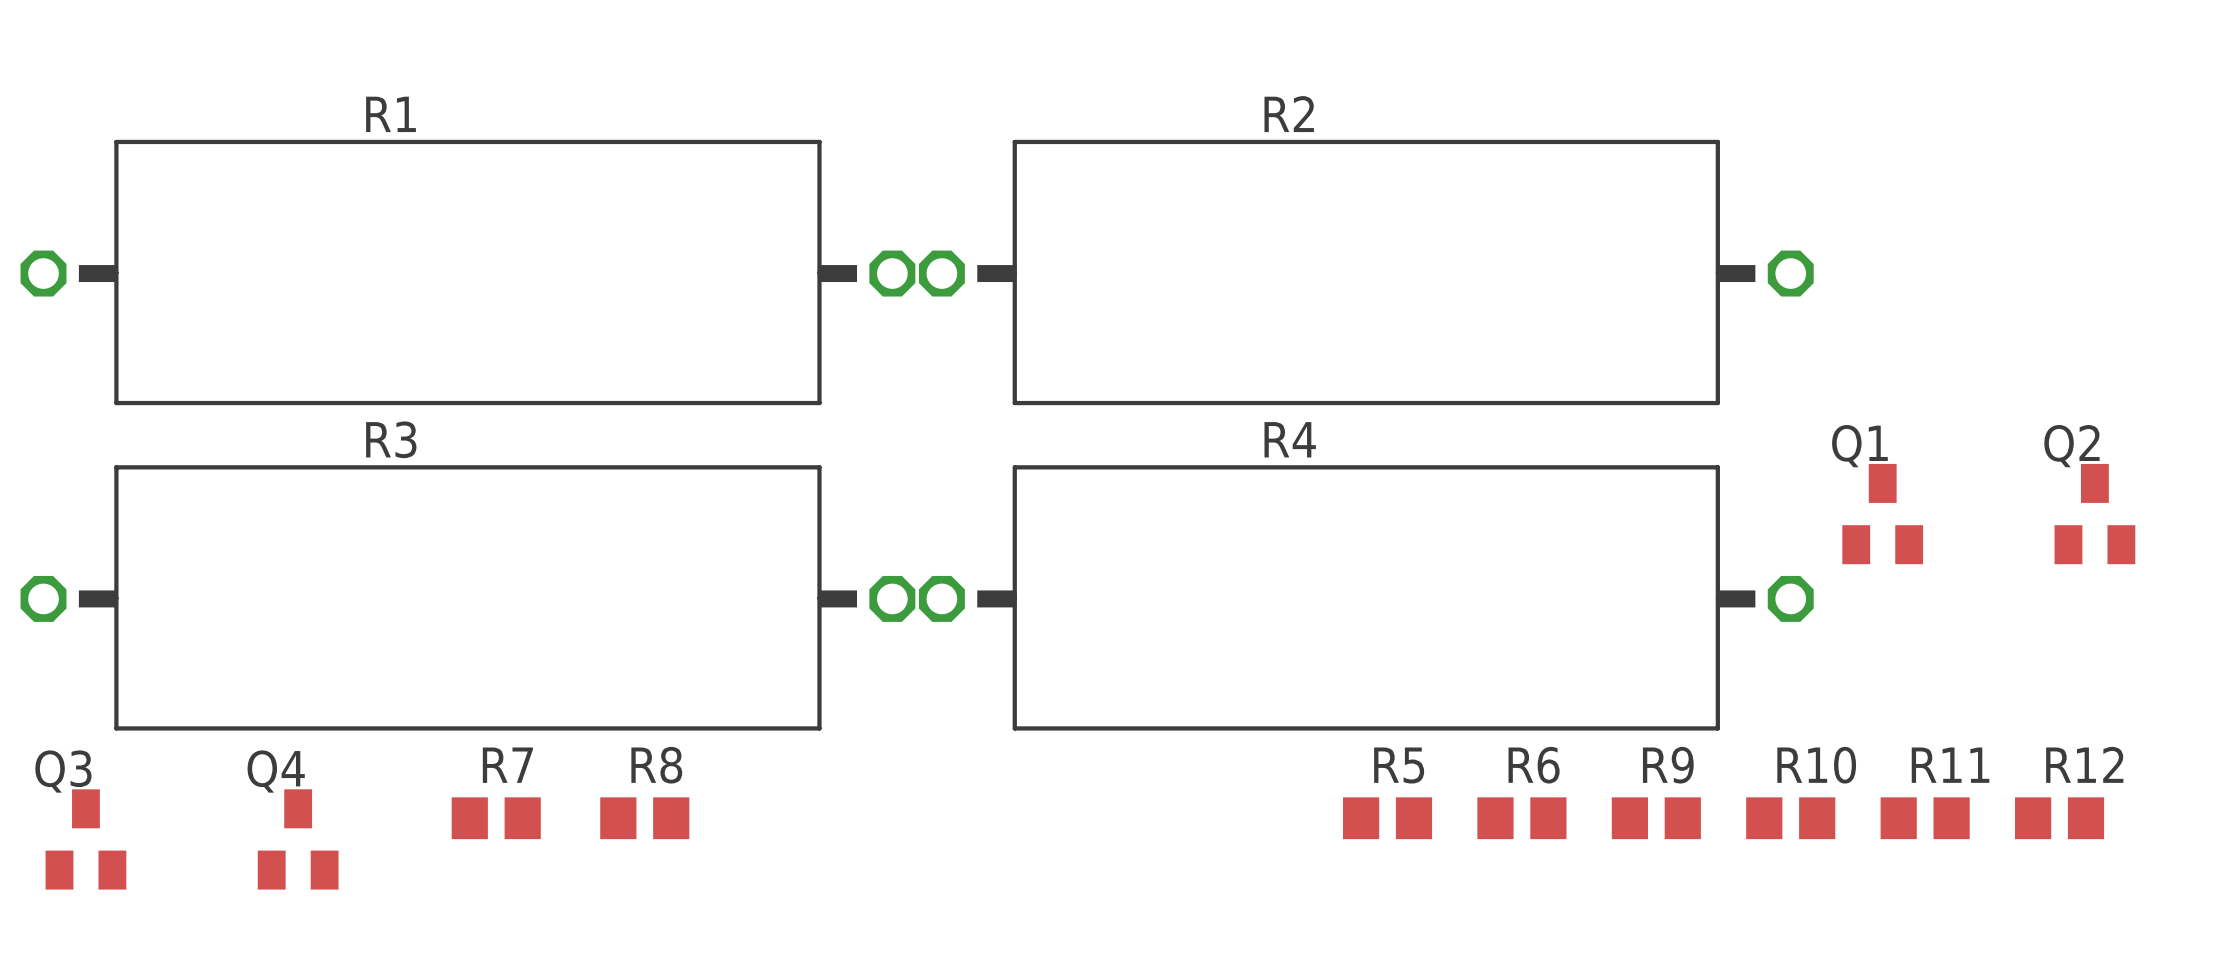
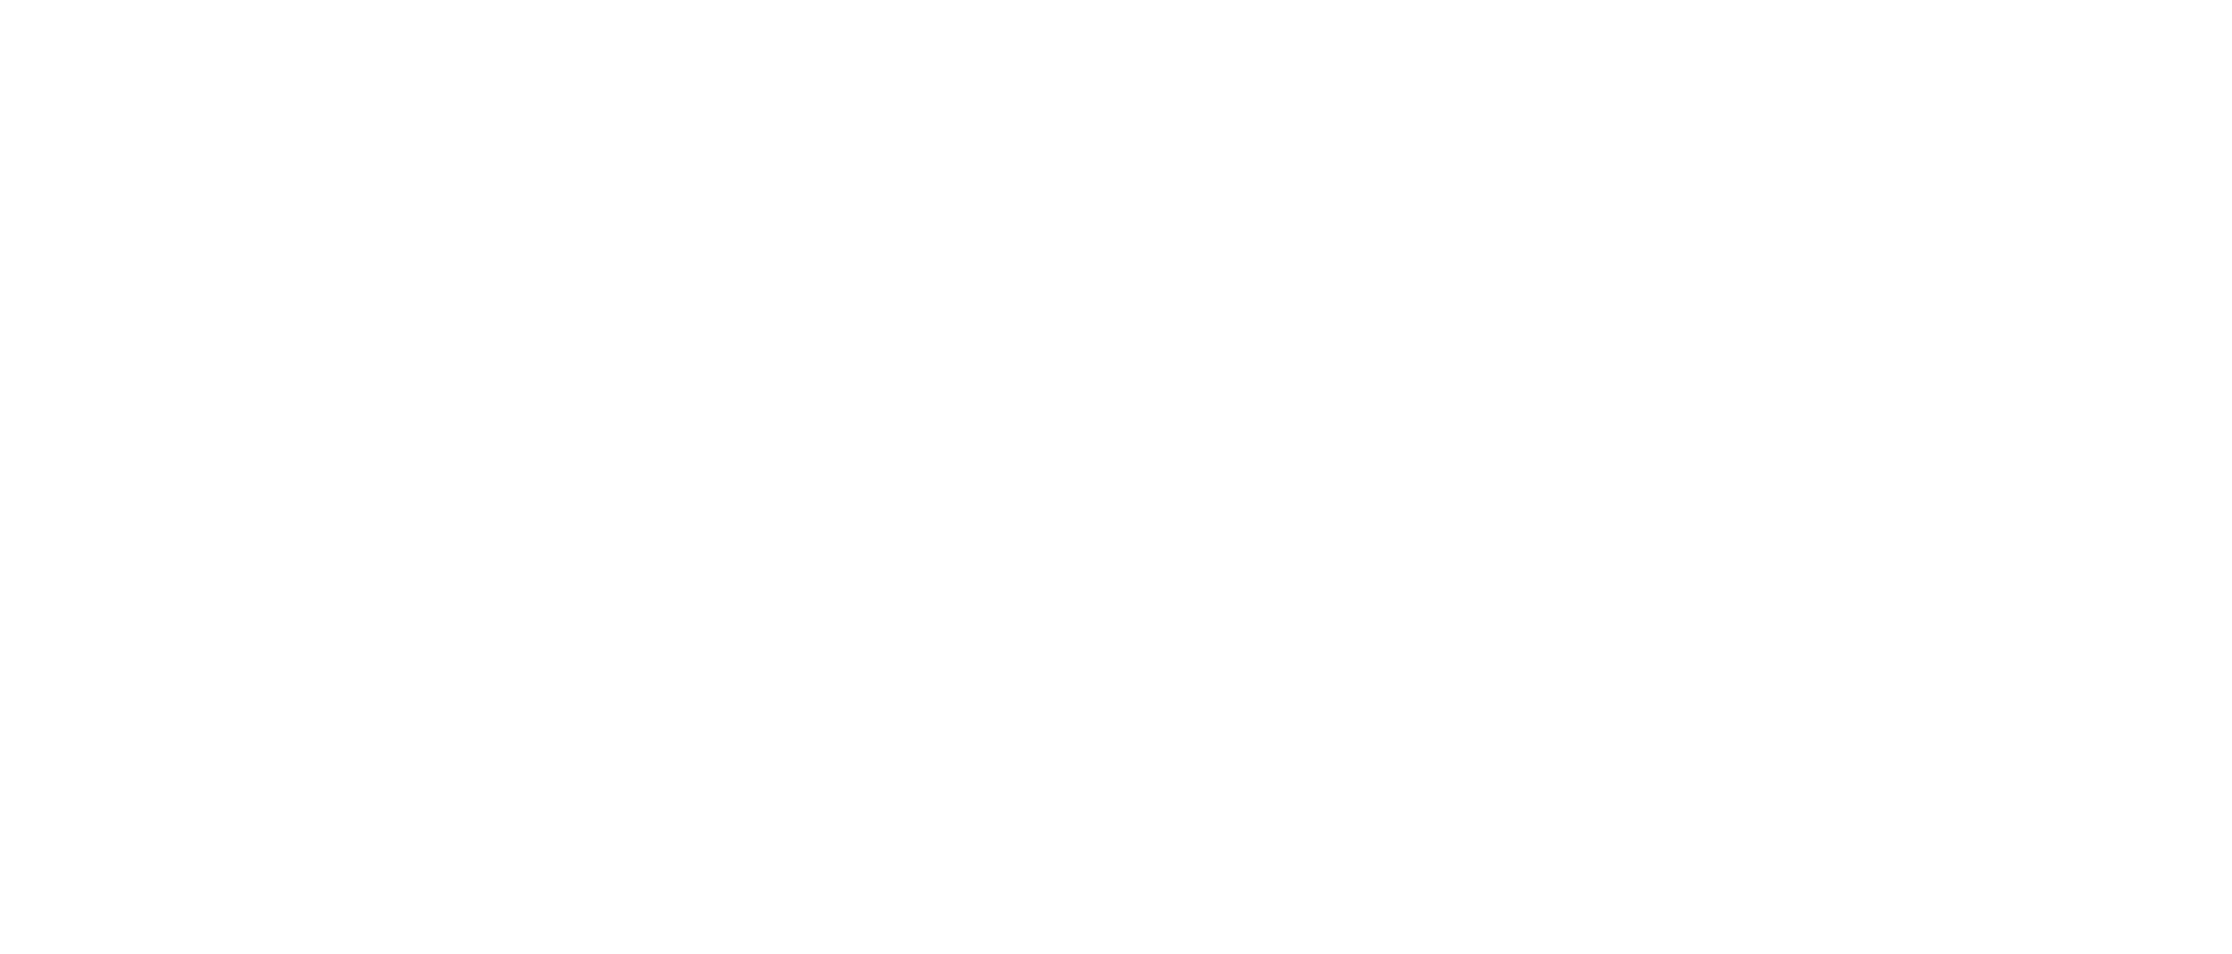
R1: (467, 272) -> none
R2: (1366, 272) -> none
Q1: (1882, 514) -> none
Q2: (2094, 514) -> none
R3: (467, 597) -> none
R4: (1366, 597) -> none
R7: (496, 818) -> none
R8: (644, 818) -> none
R5: (1387, 818) -> none
R6: (1521, 818) -> none
R9: (1656, 818) -> none
R10: (1790, 818) -> none
R11: (1925, 818) -> none
R12: (2059, 818) -> none
Q3: (85, 839) -> none
Q4: (298, 839) -> none

